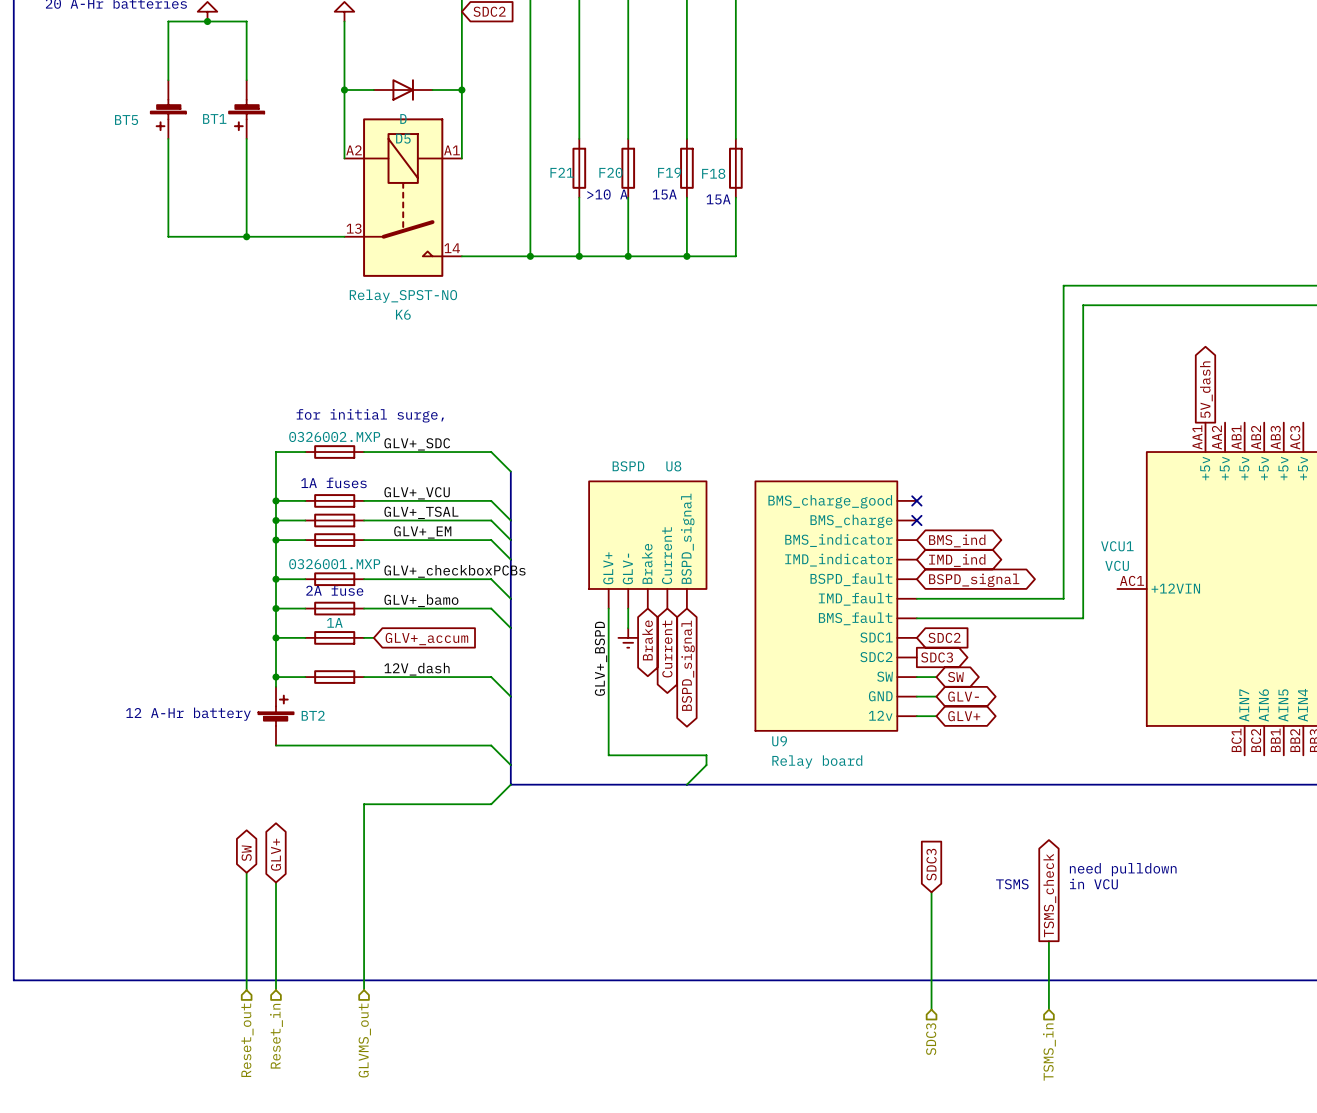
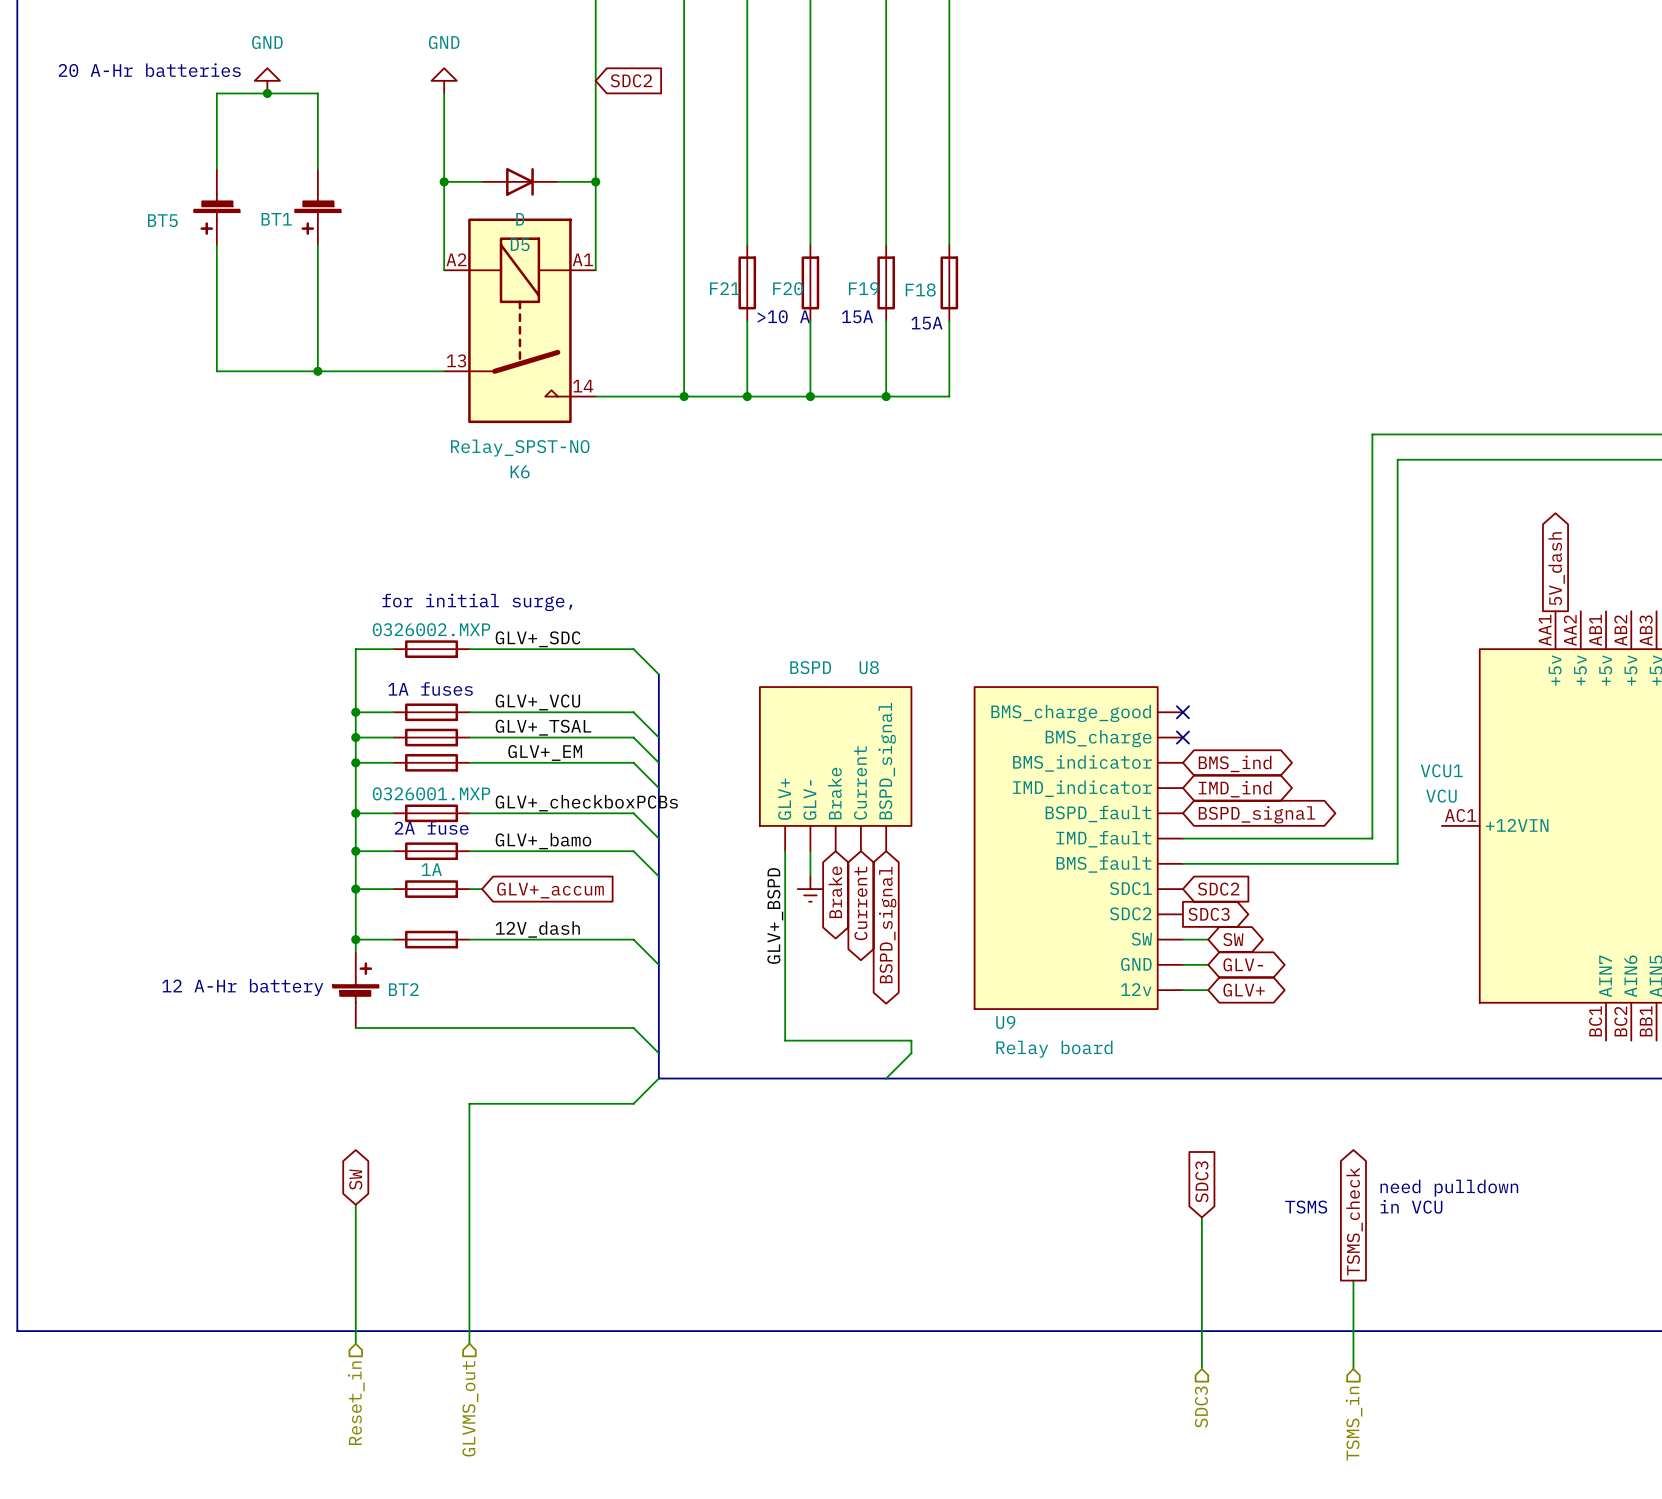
global label: SW (246, 853) -> none
global label: GLV+ (276, 854) -> SW (355, 1179)
wire: (246, 872) (246, 990) -> none
hierarchical label: Reset_out (247, 1040) -> none

